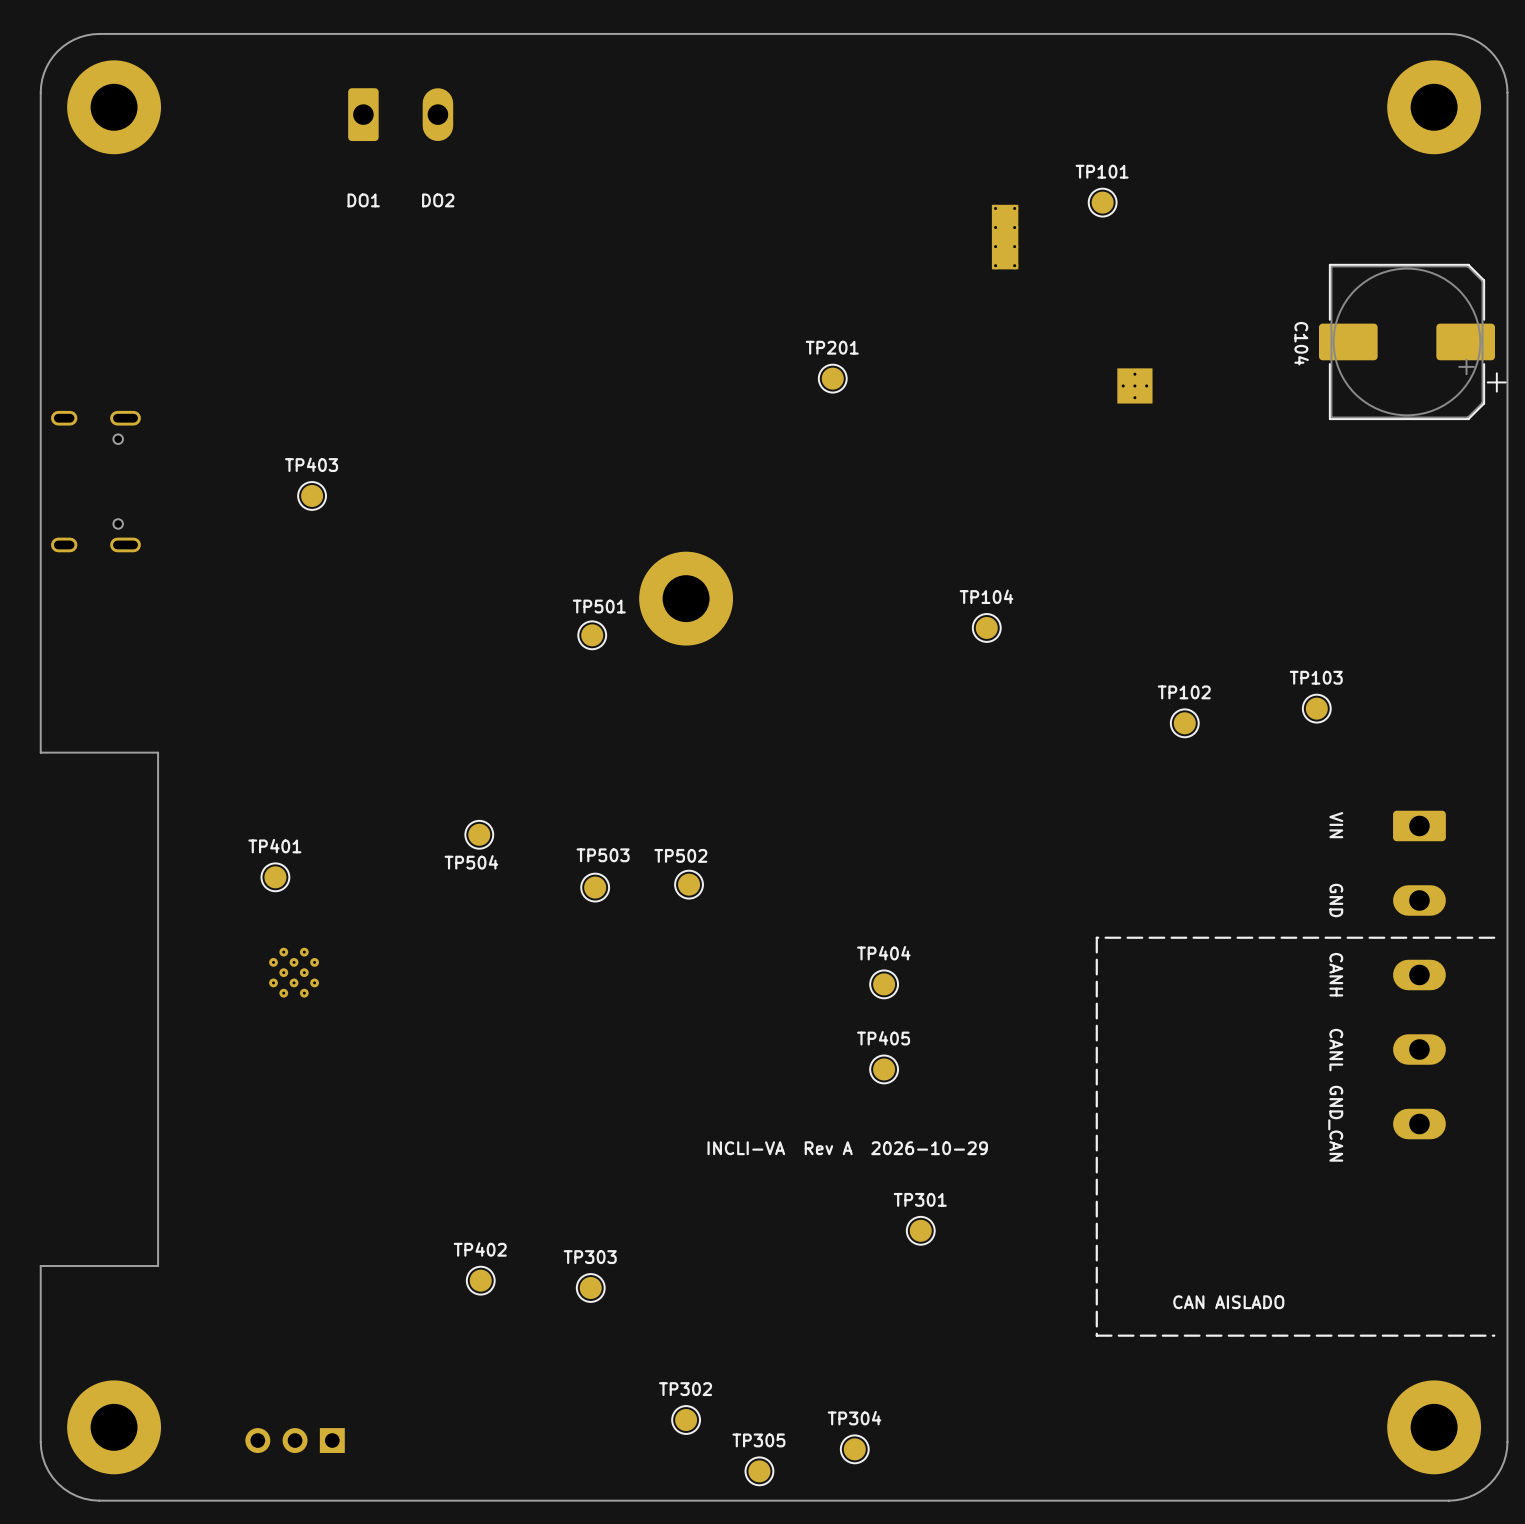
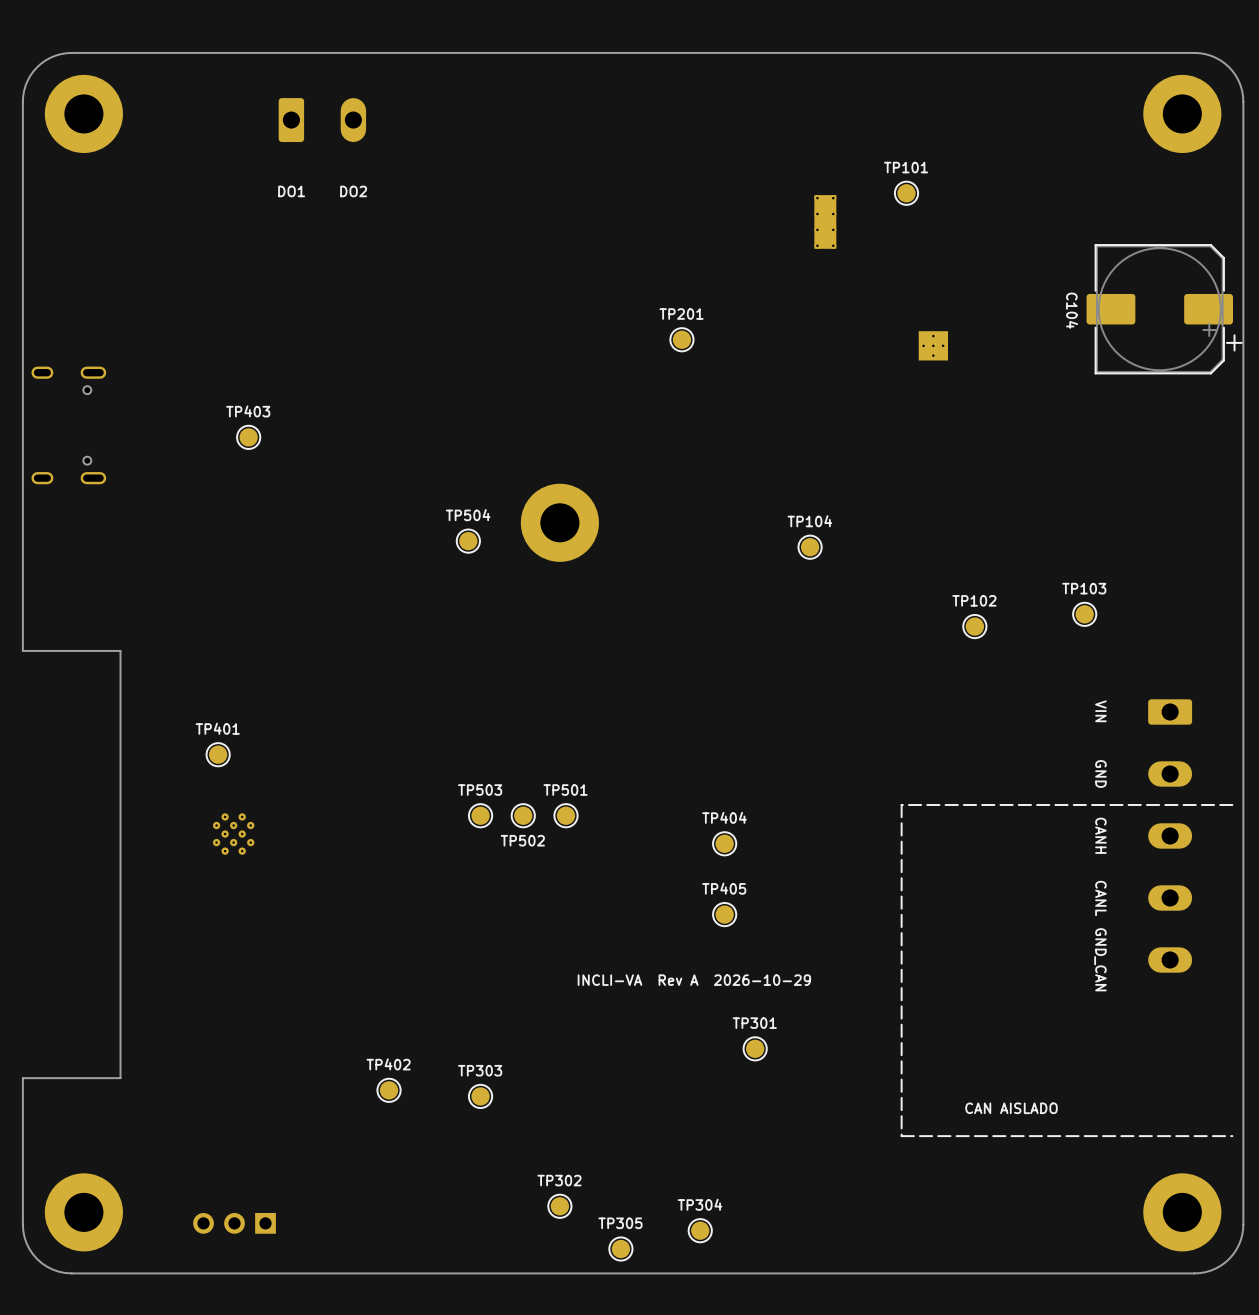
TP501 name position: TP501 (599, 606) -> TP501 (565, 790)
TP501 position: (592, 635) -> (565, 815)
TP504 position: (479, 834) -> (468, 541)
TP503 name position: TP503 (603, 855) -> TP503 (480, 790)
TP502 name position: TP502 (680, 855) -> TP502 (522, 840)
TP504 name position: TP504 (471, 862) -> TP504 (468, 515)
TP502 position: (689, 884) -> (523, 815)
TP503 position: (595, 887) -> (480, 815)

